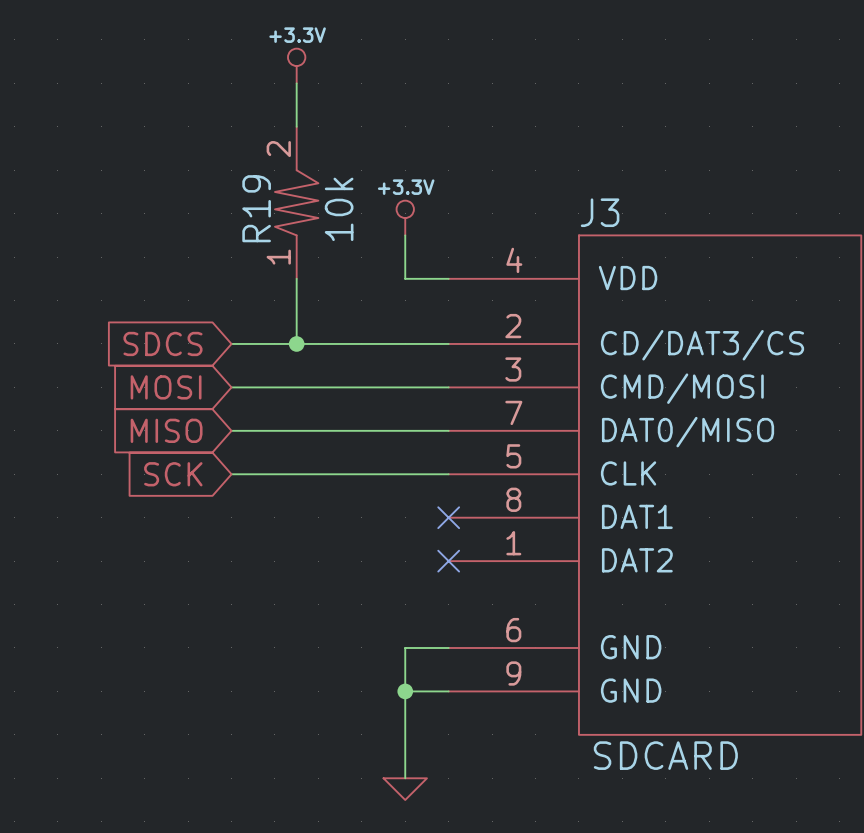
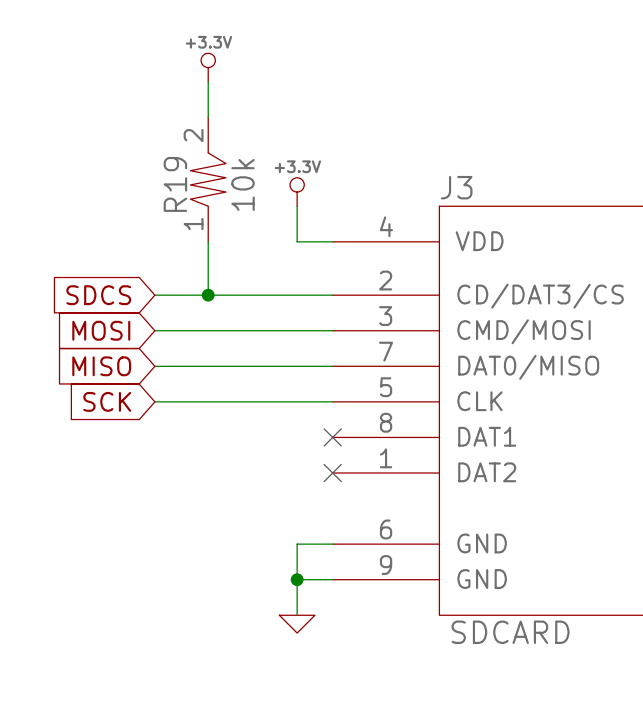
wire: (405, 734) (405, 778) -> none
power symbol position: (405, 789) -> (297, 624)

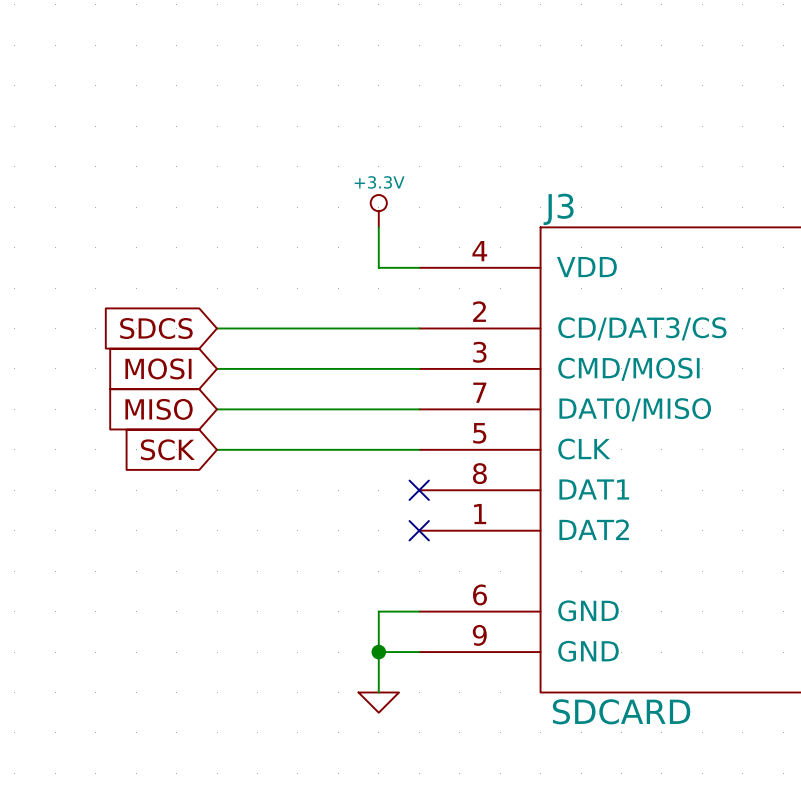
power symbol: +3.3V (208, 67) -> none
wire: (208, 81) (208, 117) -> none
R19: 10k (208, 179) -> none
wire: (208, 241) (208, 295) -> none
junction: (208, 295) -> none

